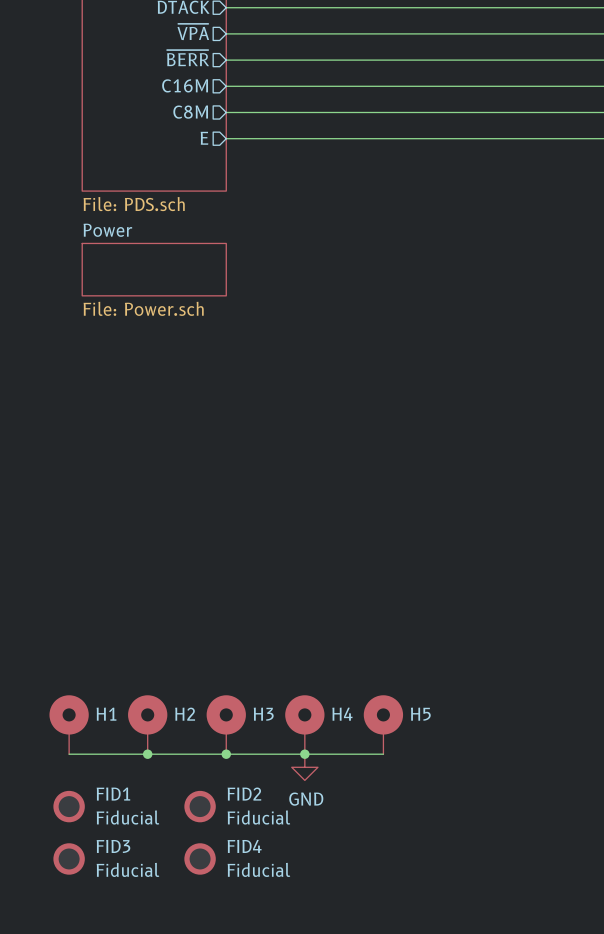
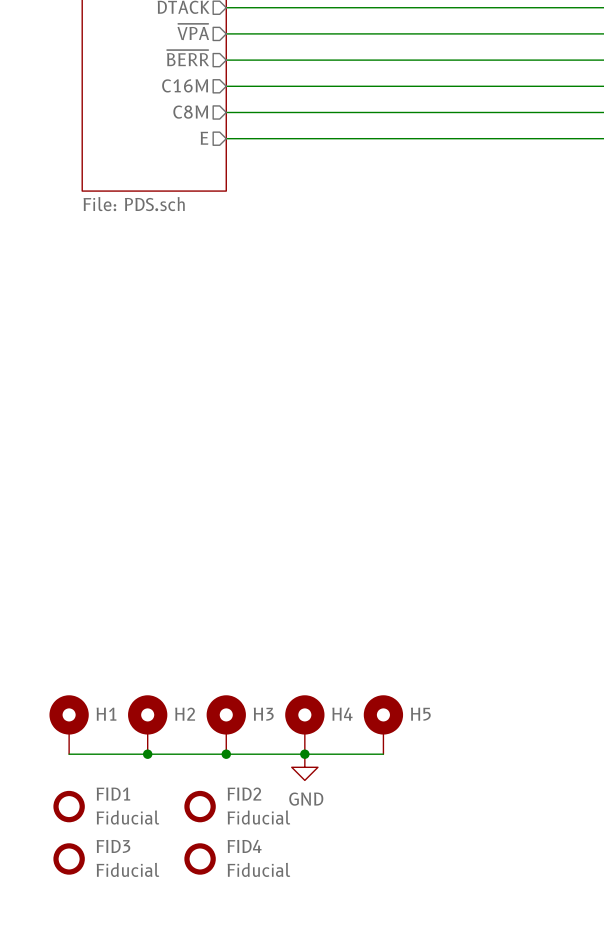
sheet Power: File: Power.sch (154, 269) -> none

